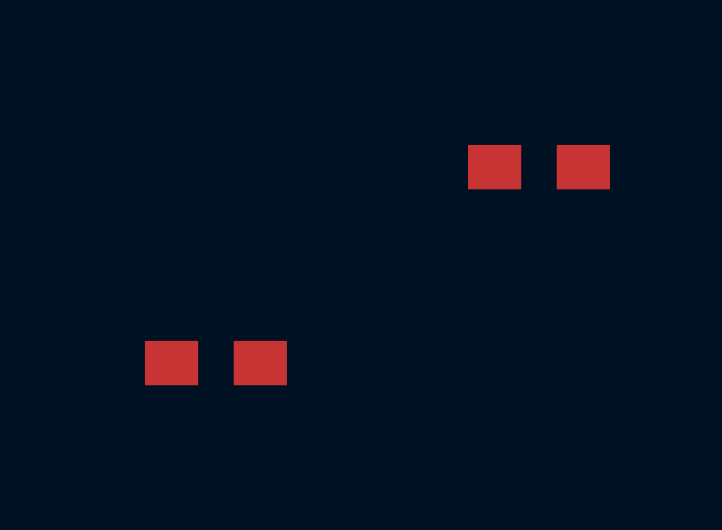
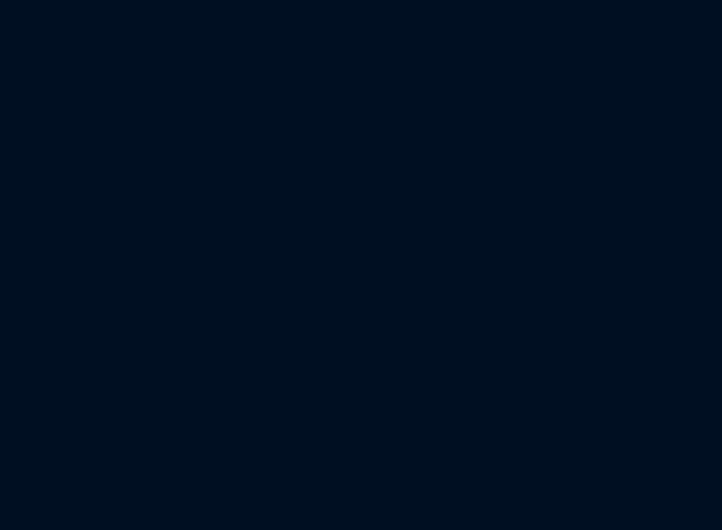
part: (538, 167) -> none
part: (215, 363) -> none

